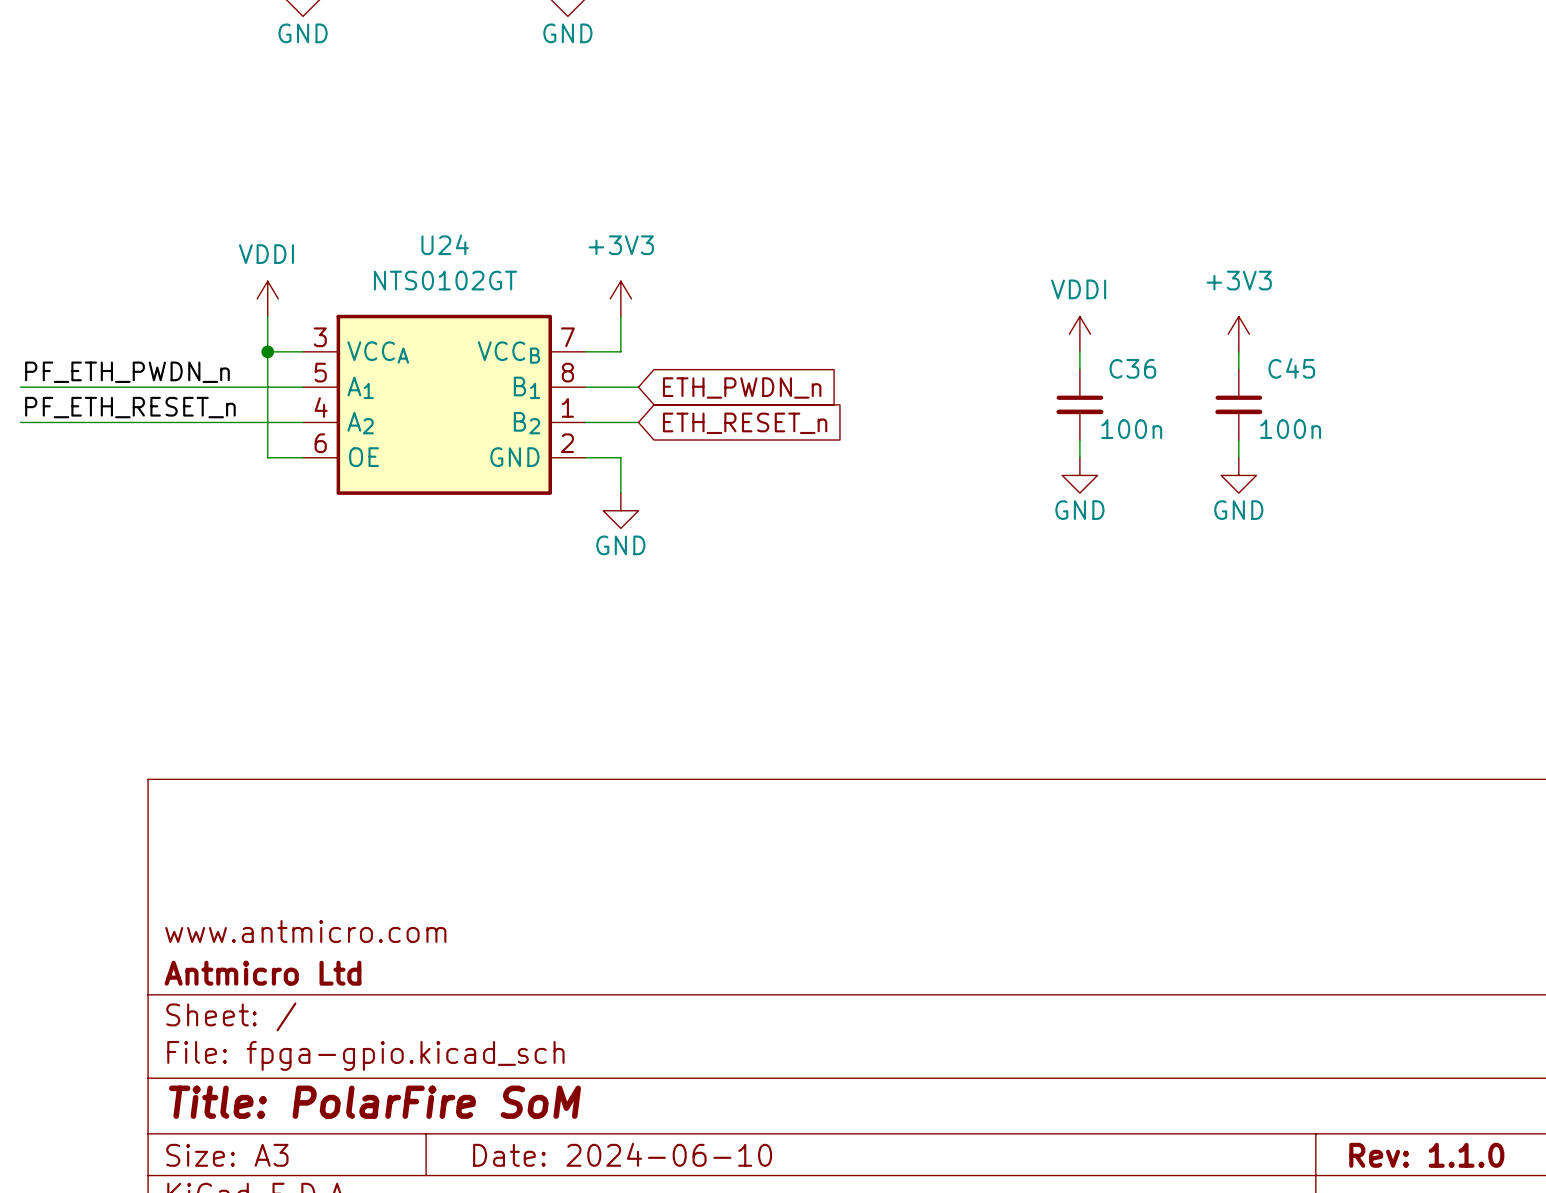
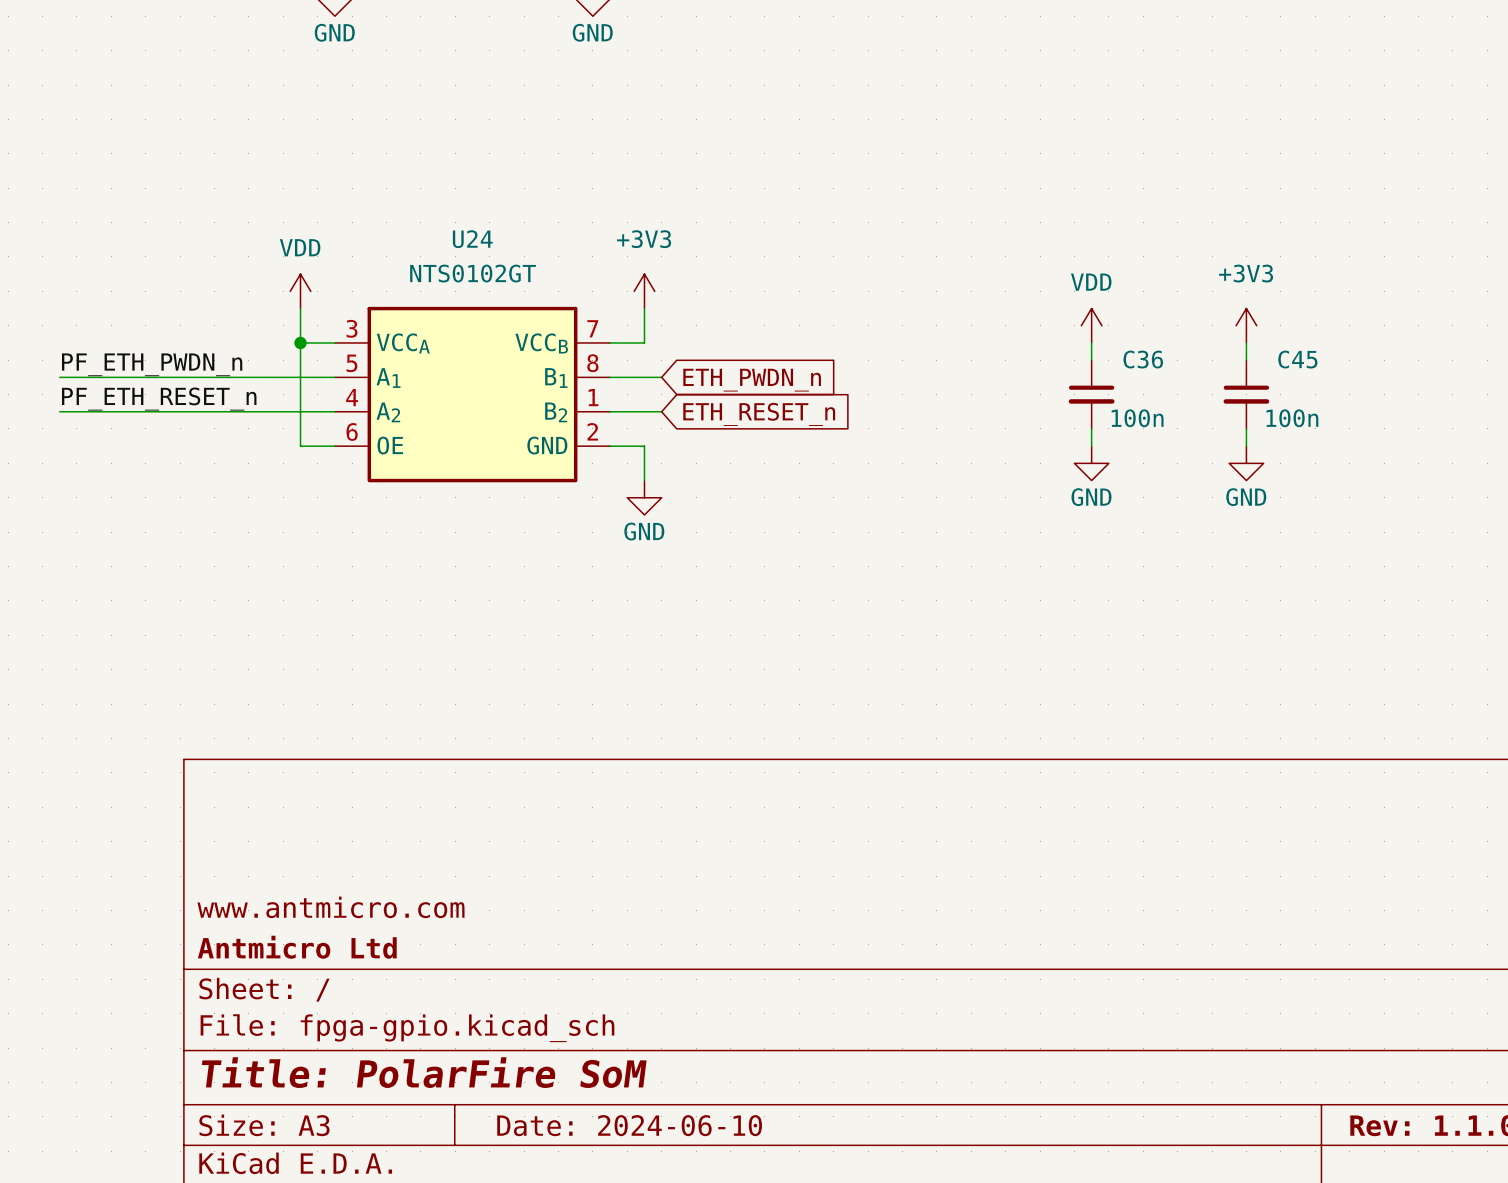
power symbol: VDDI (267, 298) -> VDD (300, 291)
power symbol: VDDI (1079, 334) -> VDD (1091, 325)

